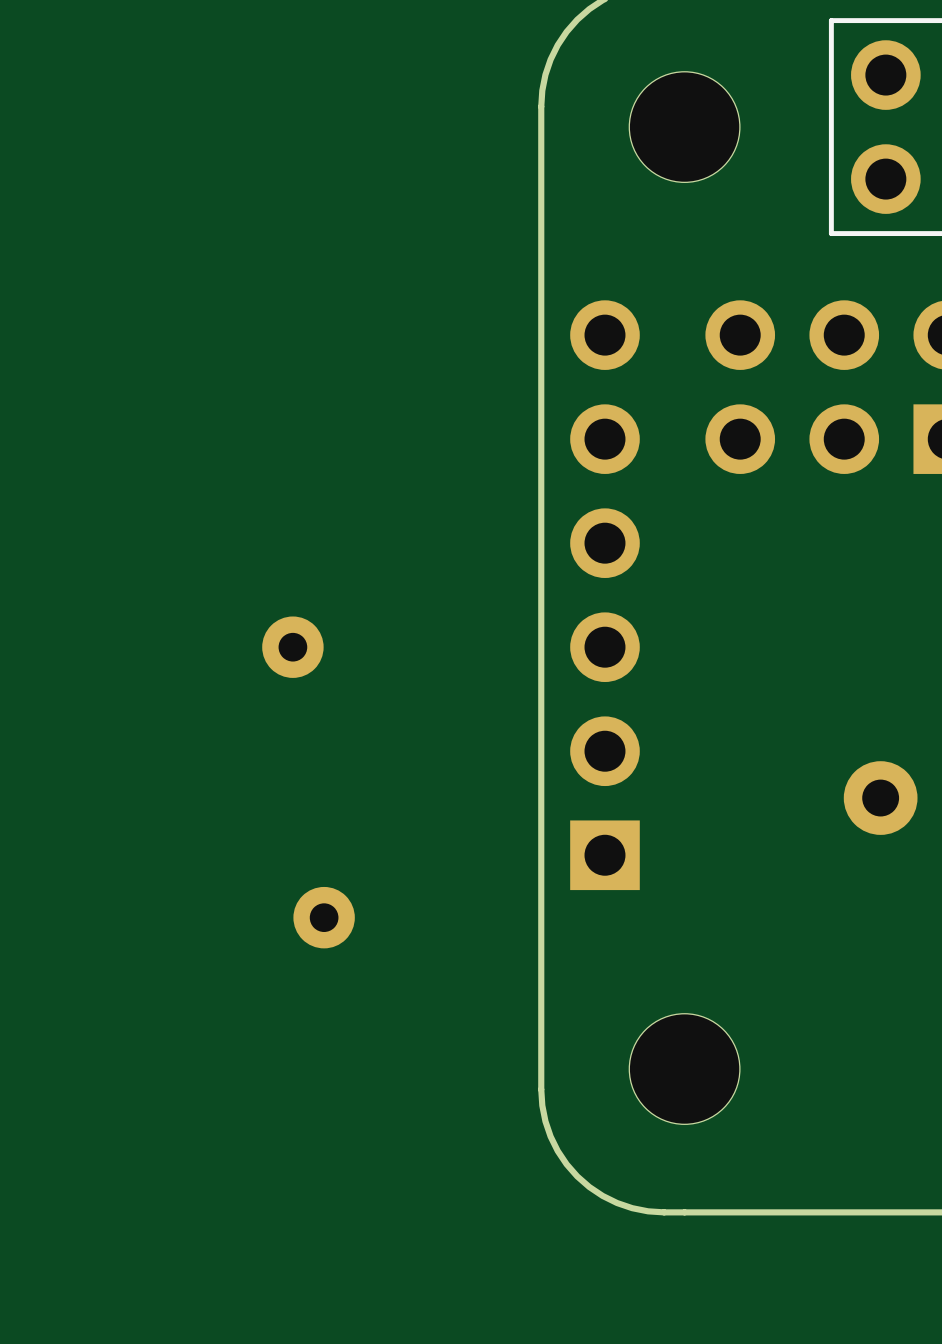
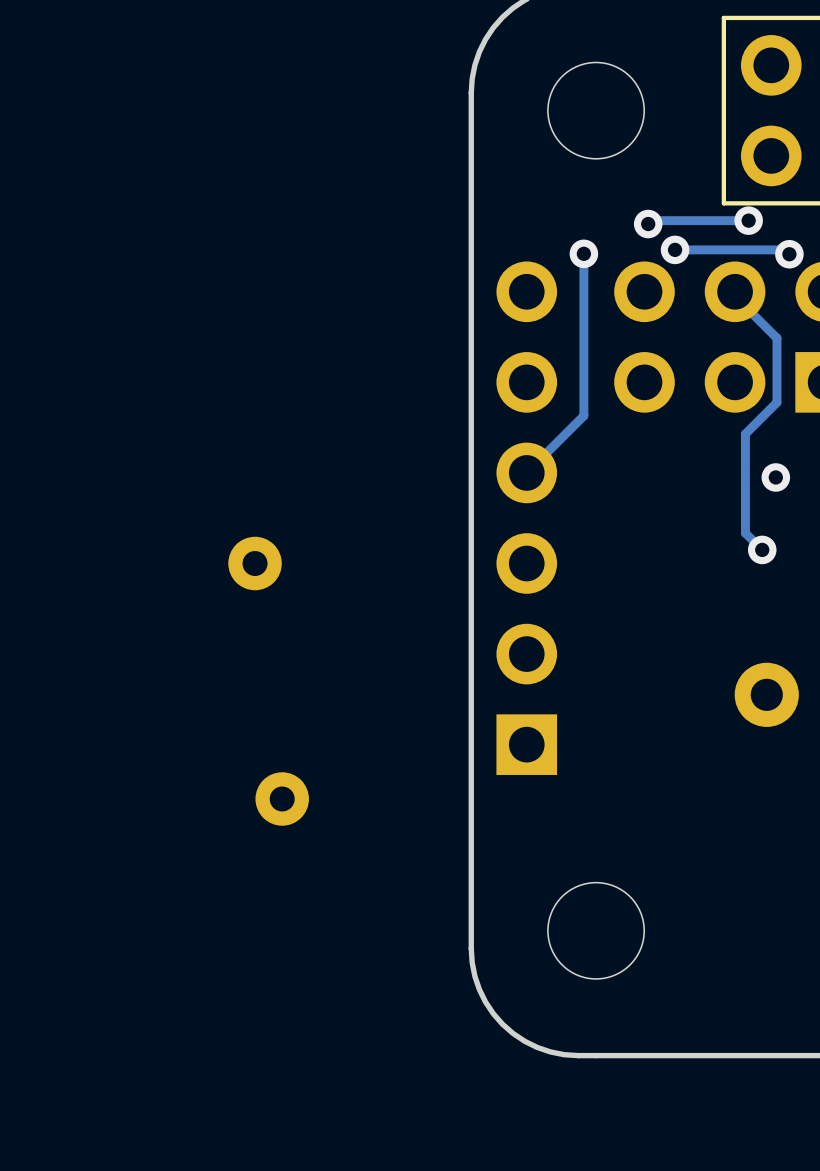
track: none -> (748, 220) (651, 220) (648, 224)
via: none -> (748, 220)
via: none -> (648, 224)
track: none -> (675, 249) (785, 249) (789, 254)
via: none -> (675, 249)
track: none -> (583, 253) (583, 415) (526, 472)
via: none -> (583, 253)
via: none -> (789, 254)
track: none -> (735, 296) (776, 338) (776, 402) (745, 433) (745, 533) (762, 549)
via: none -> (775, 477)
via: none -> (762, 549)

